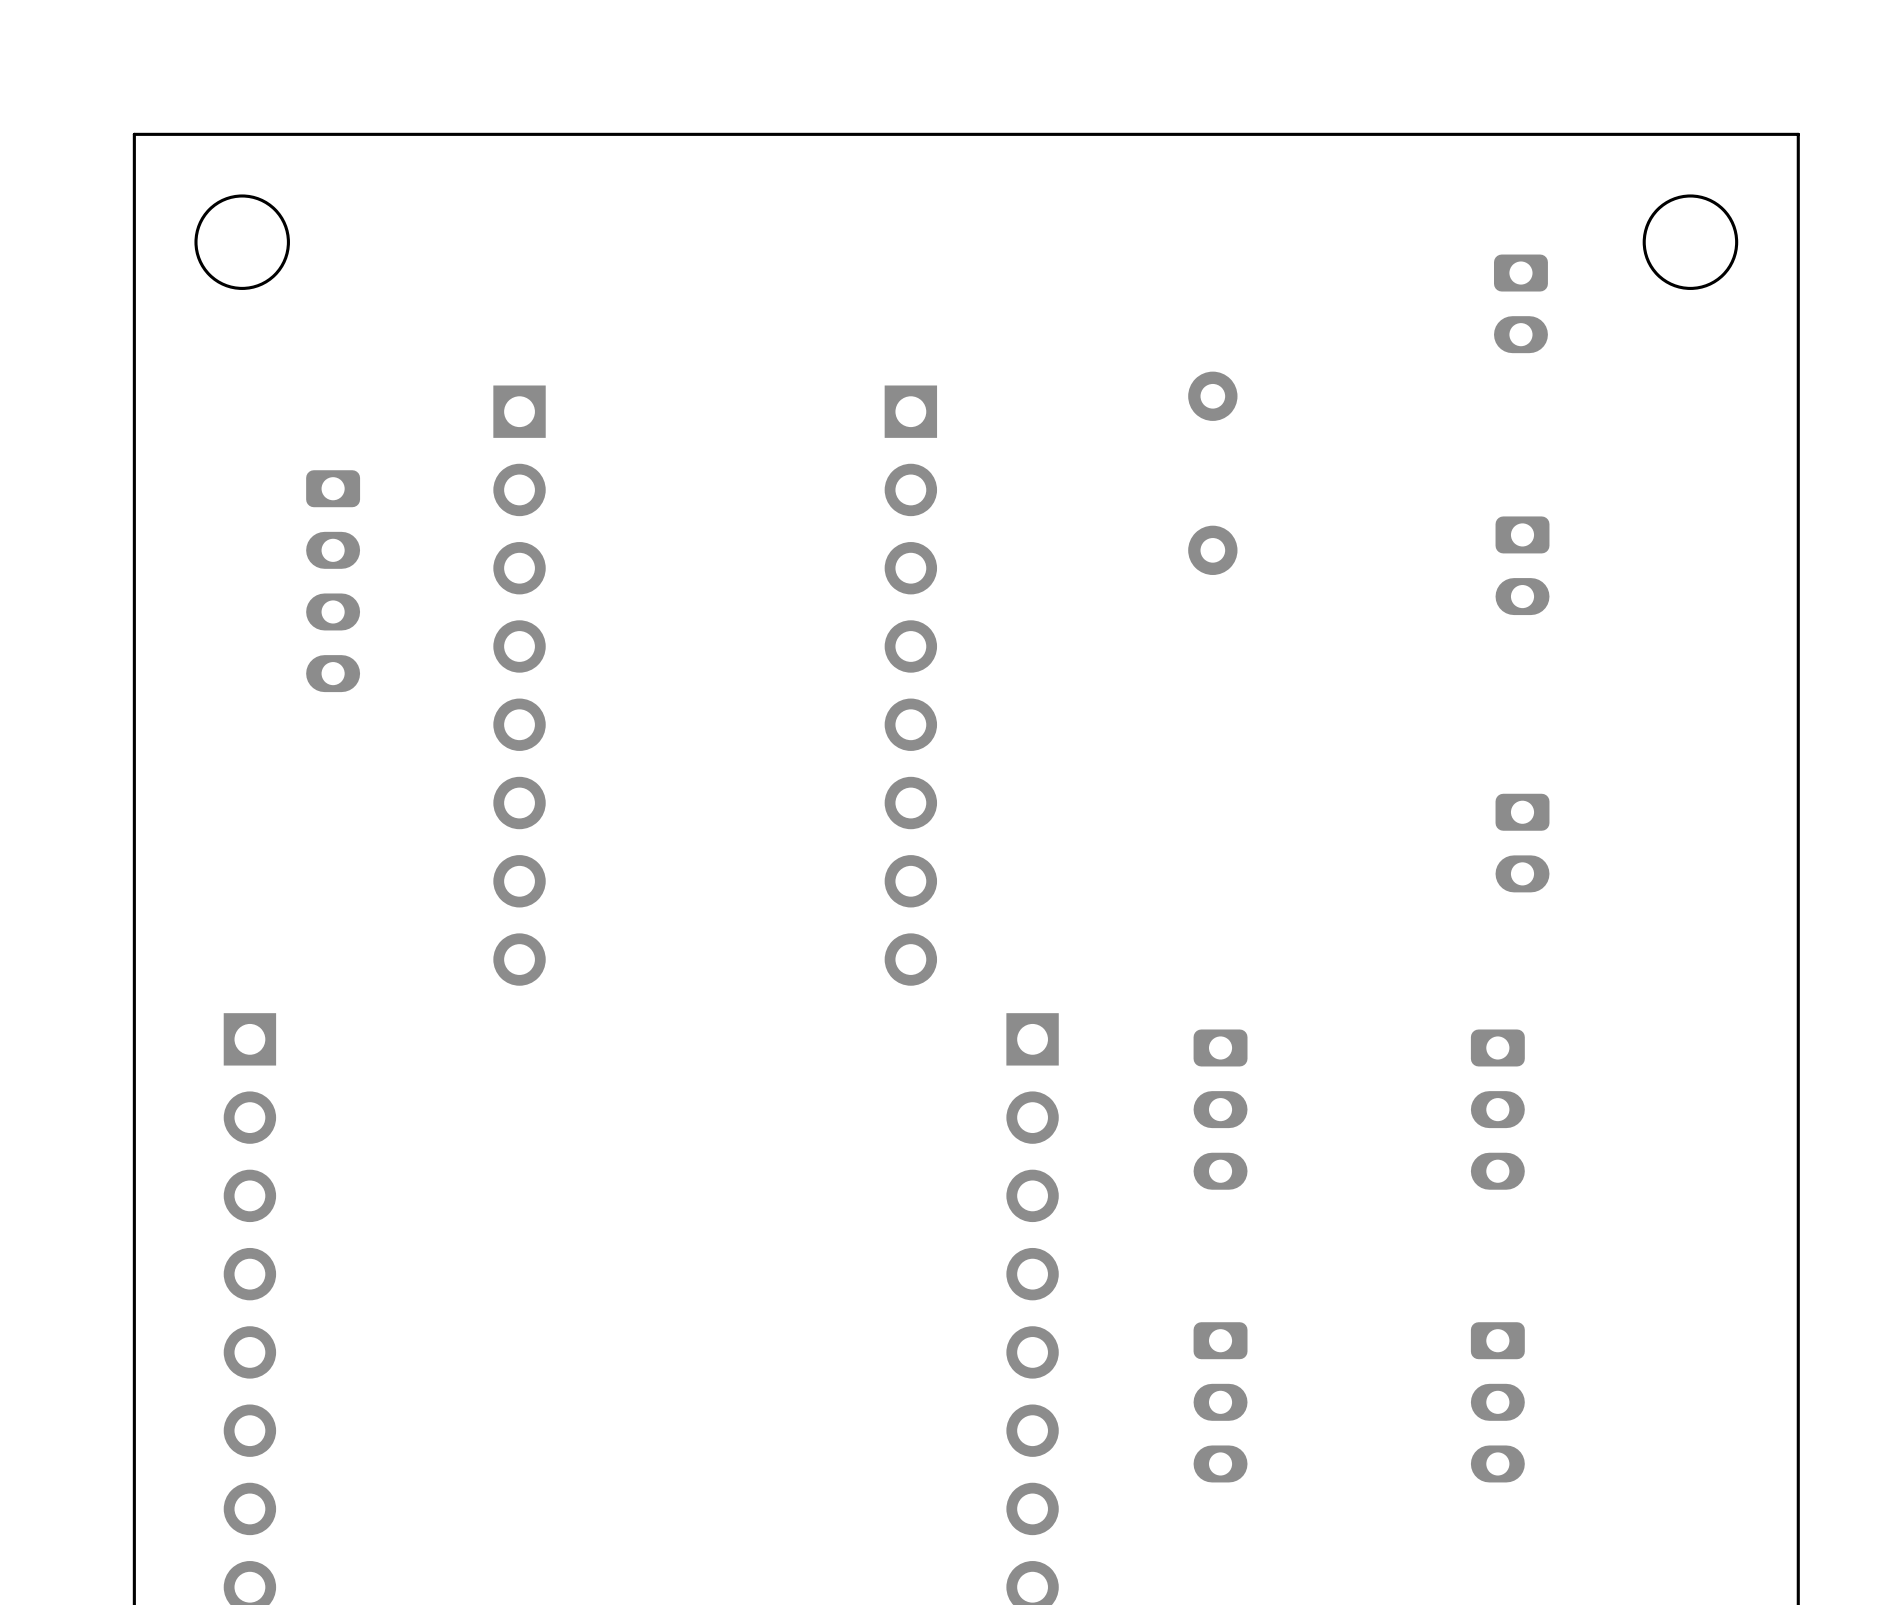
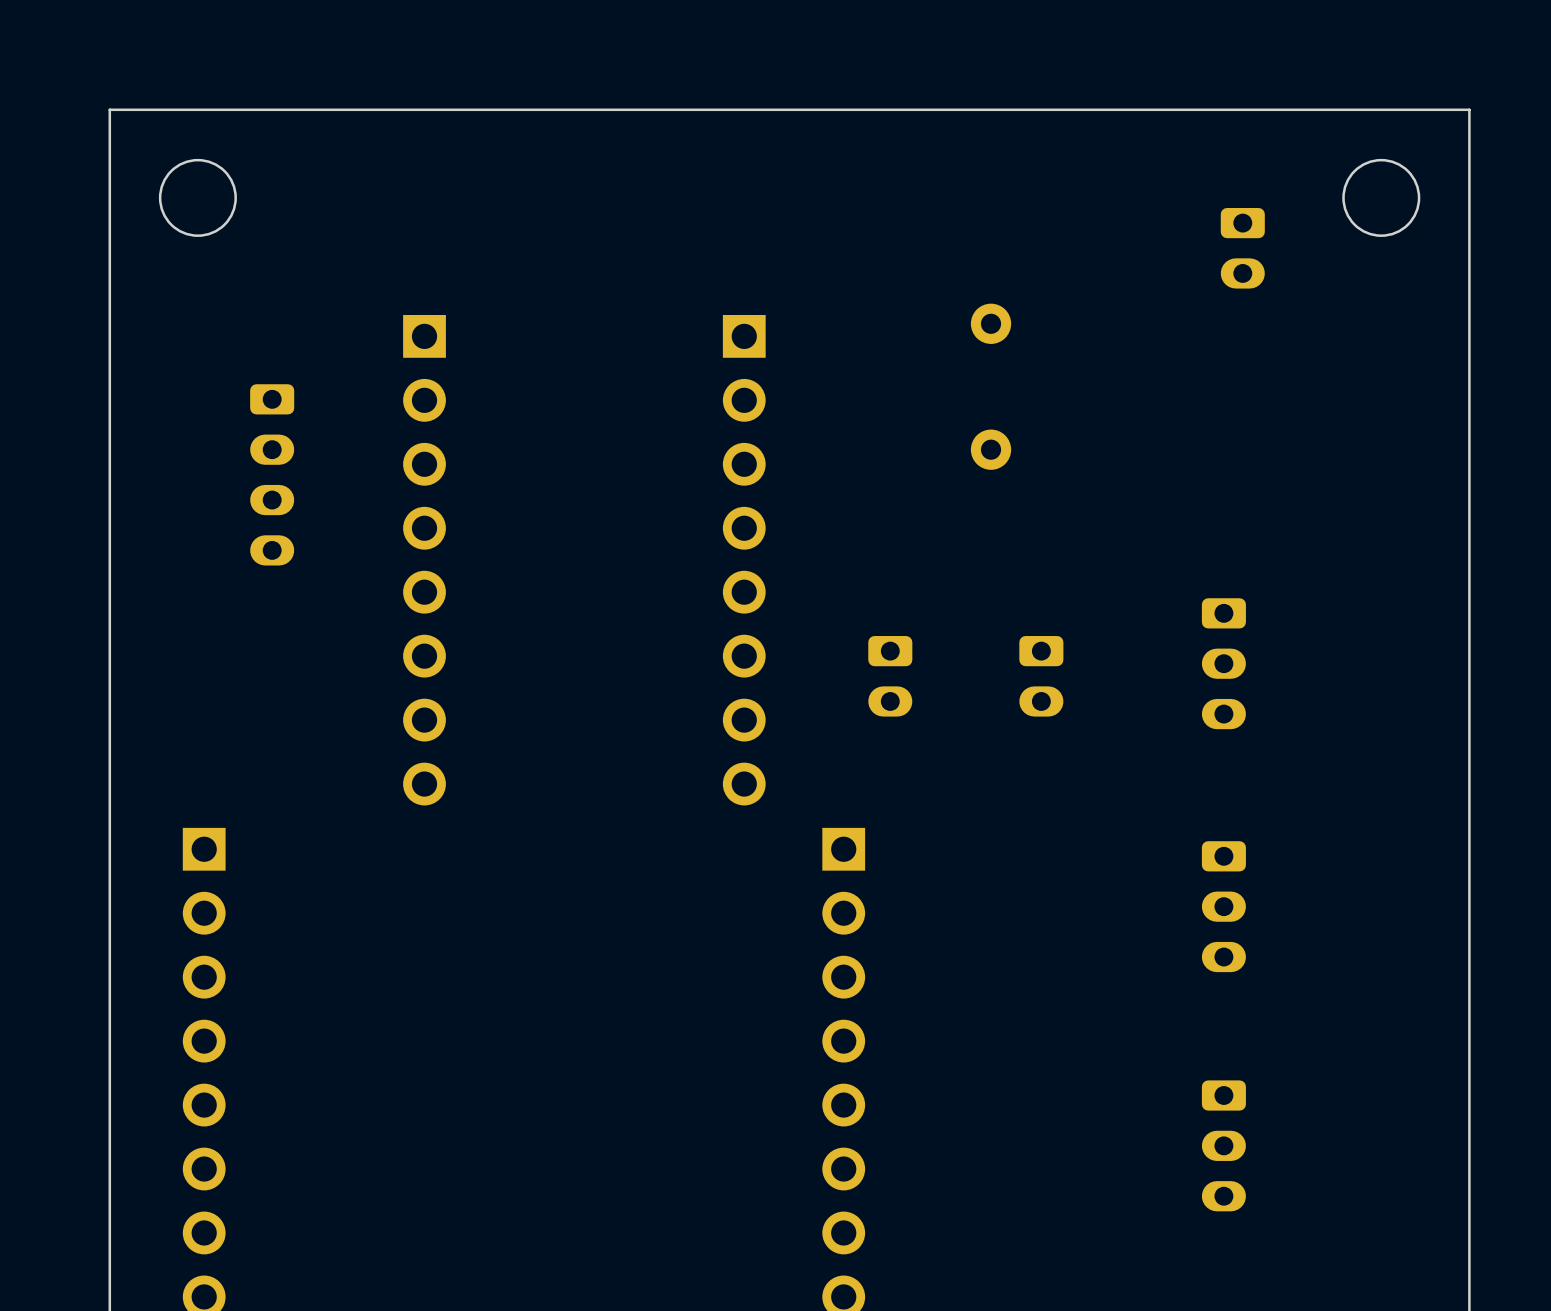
part: (1522, 565) -> none
part: none -> (1223, 663)
part: none -> (890, 676)
part: none -> (1041, 676)
part: (1522, 843) -> none
part: (1220, 1109) -> none
part: (1220, 1402) -> none

